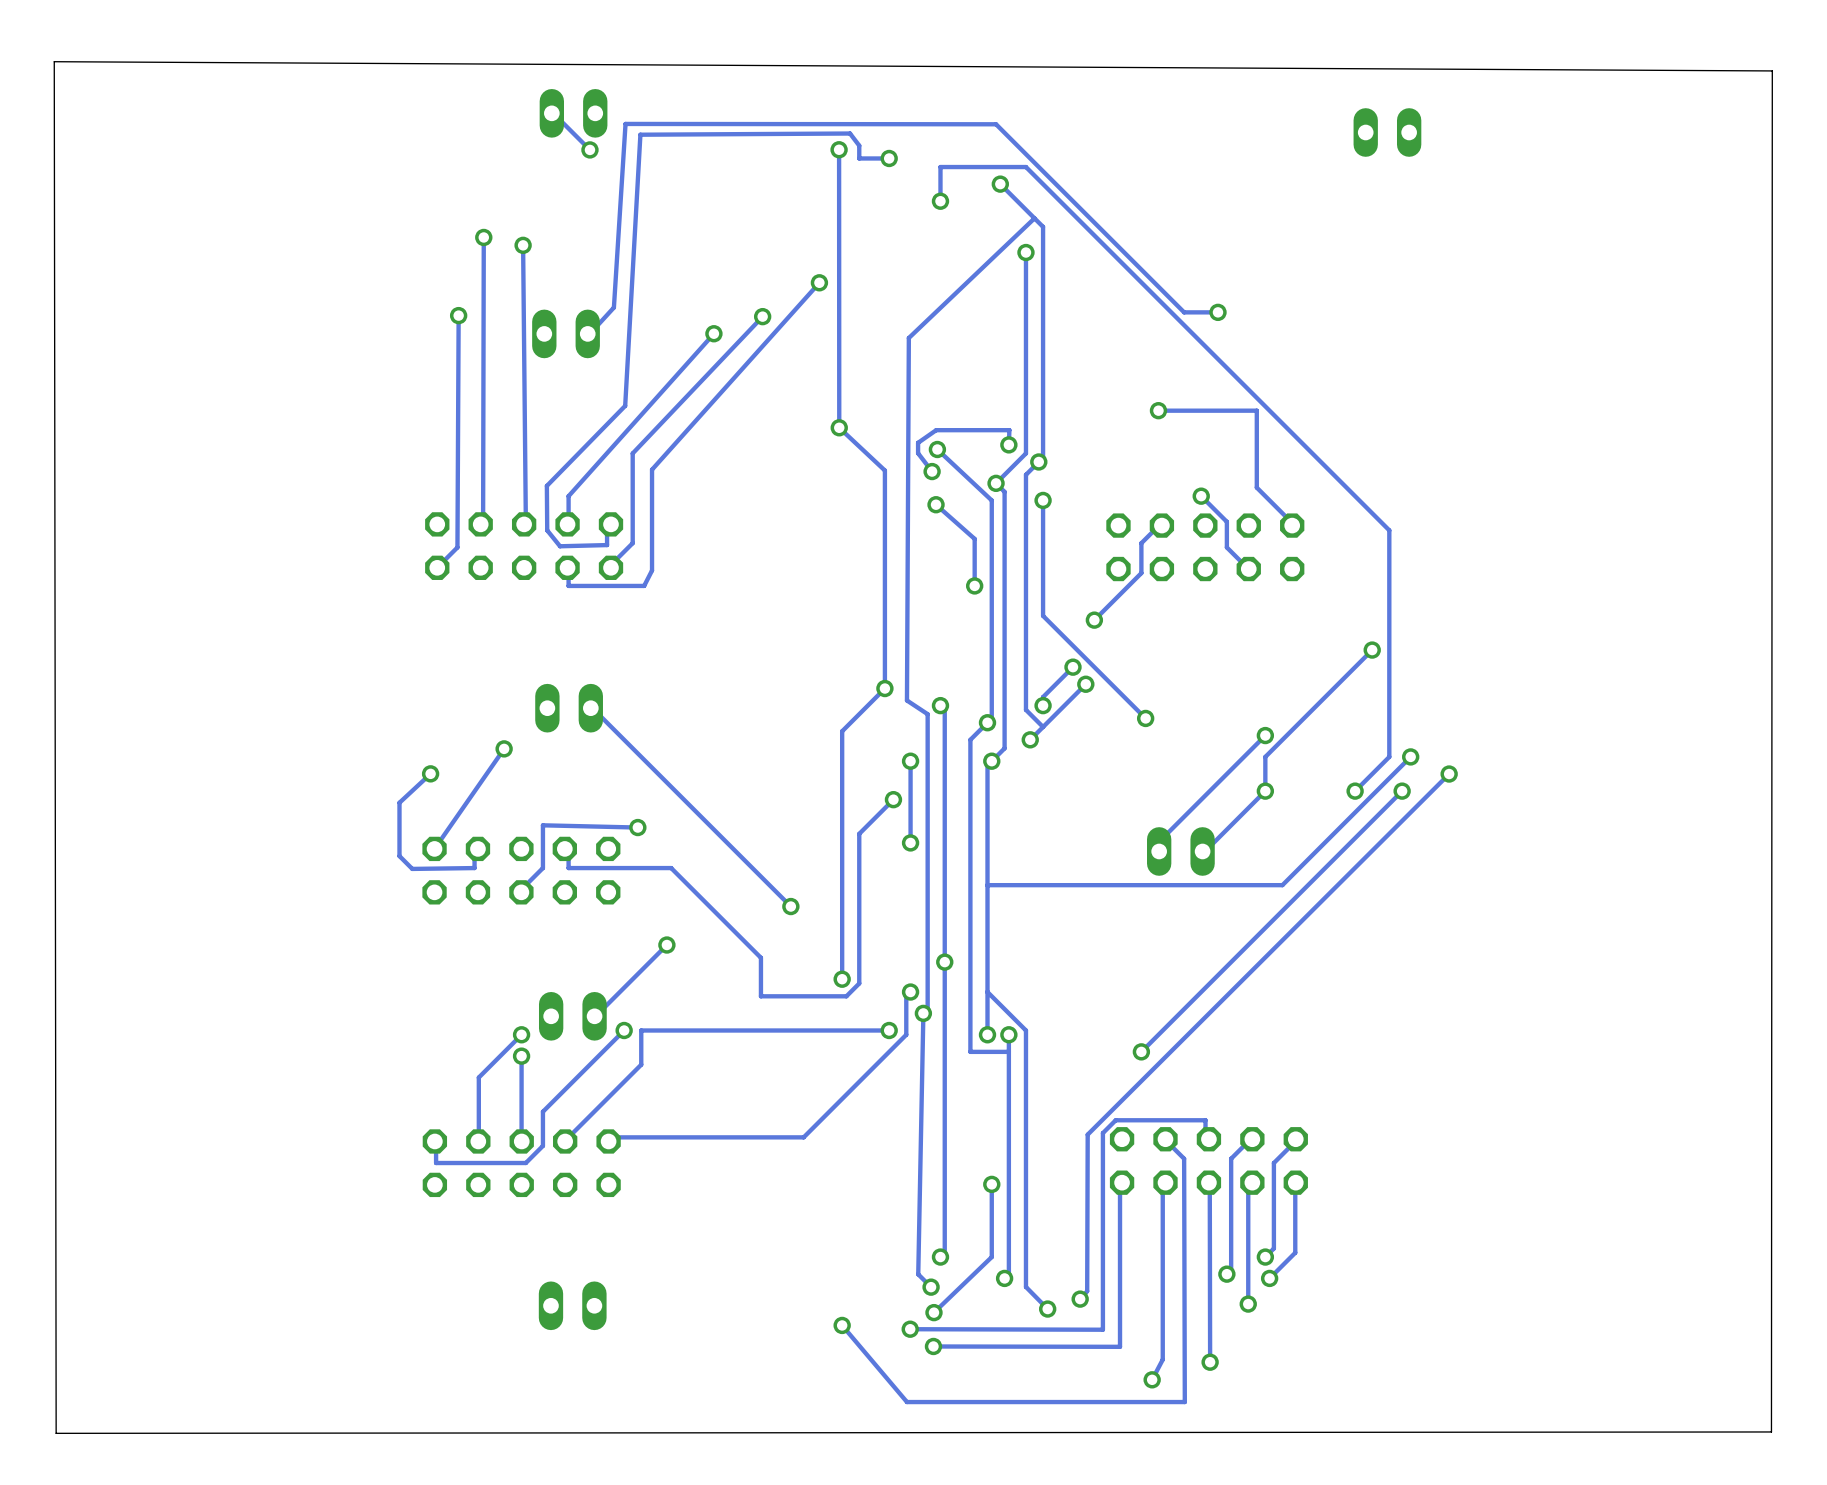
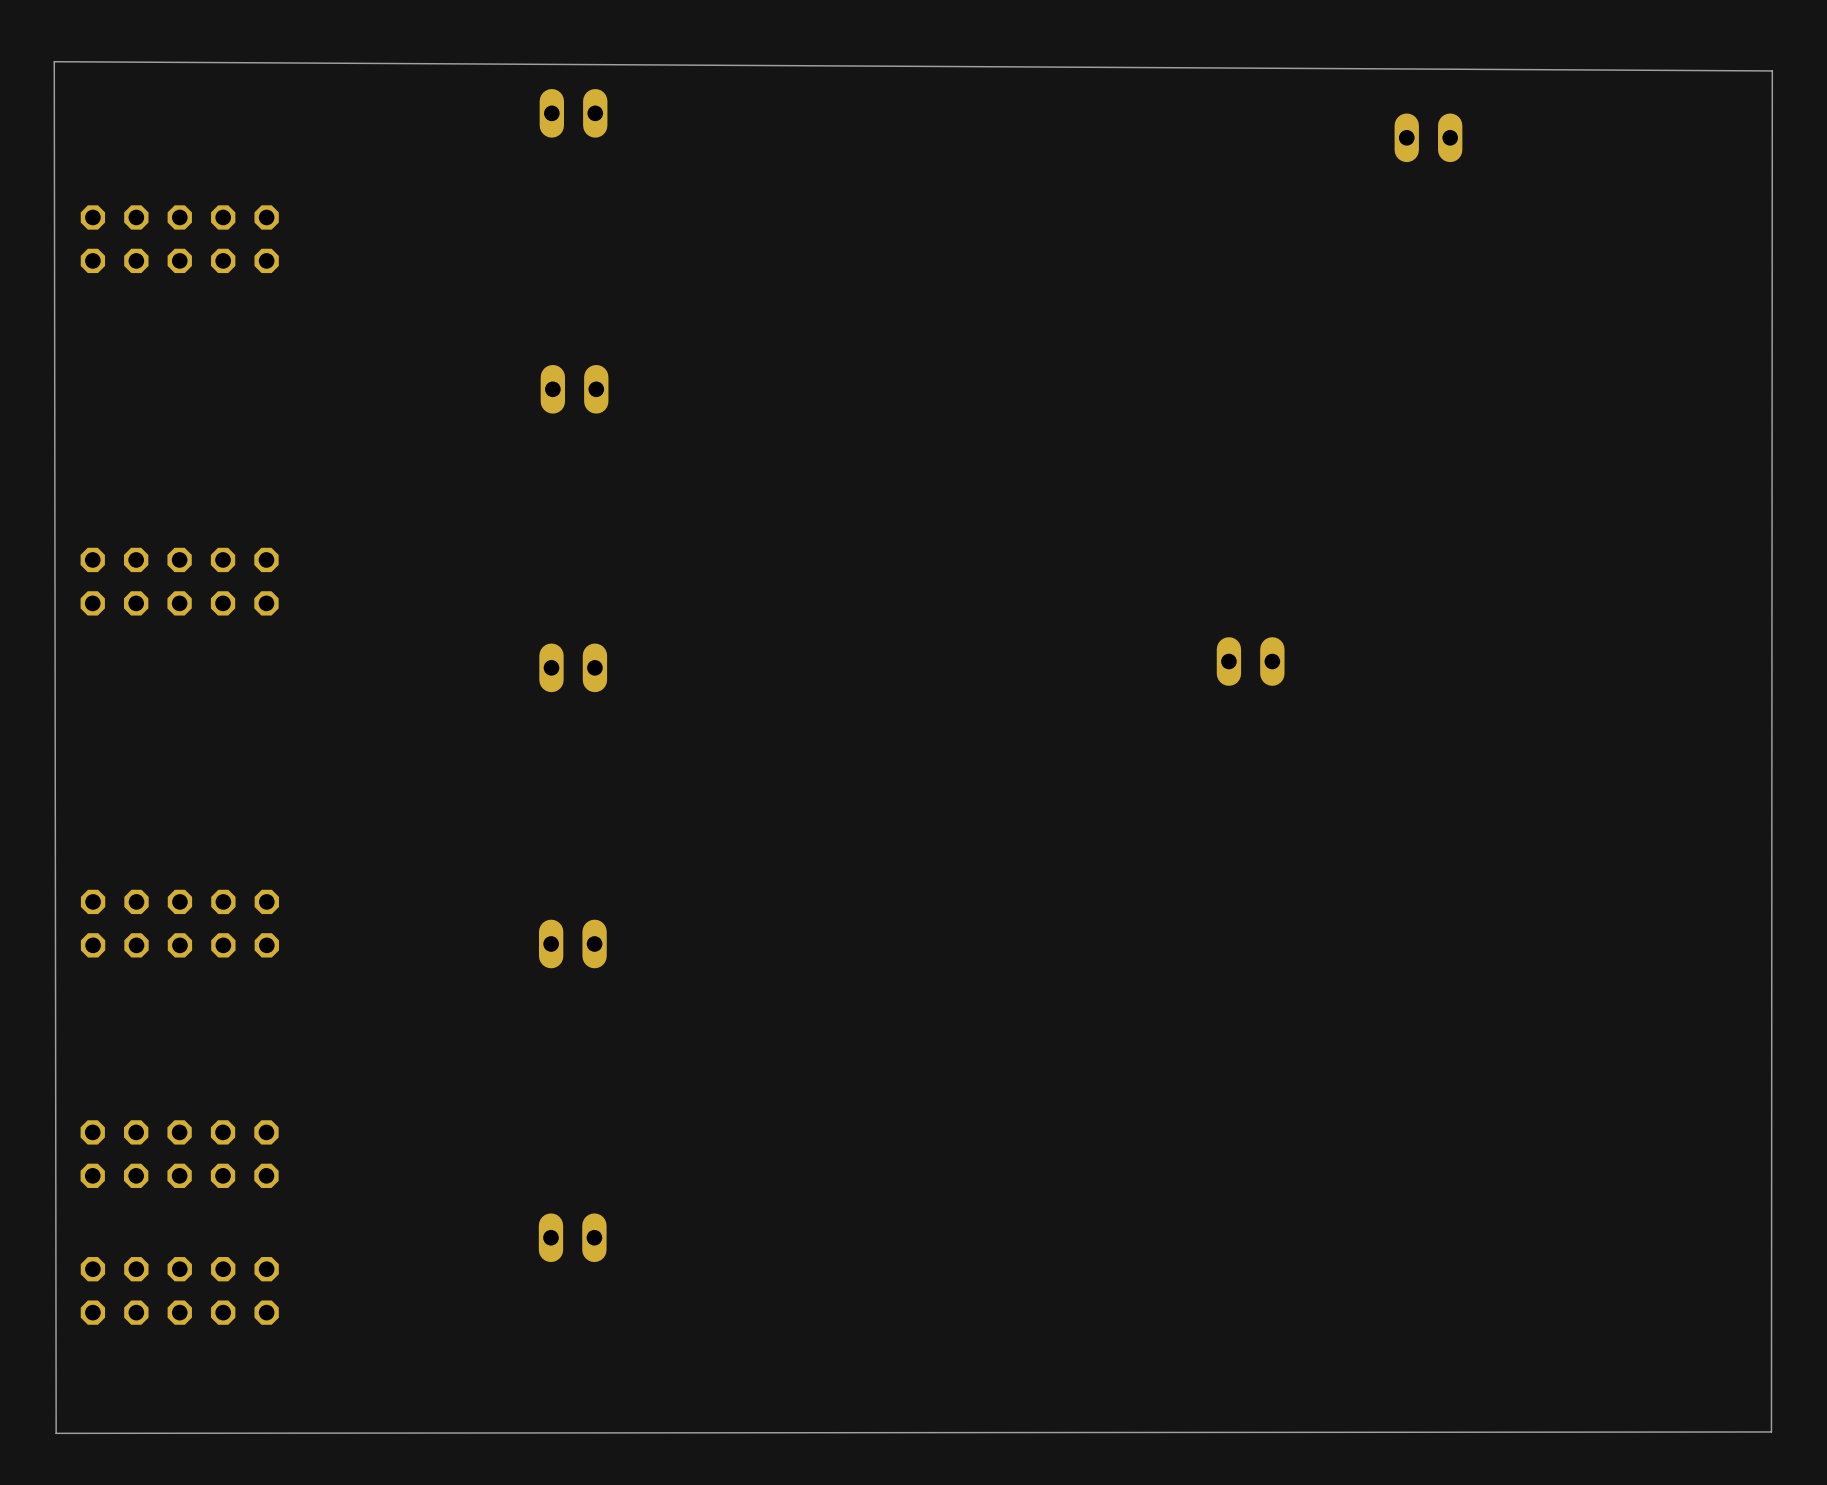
track: (551, 113) (589, 149) -> none
part position: (1387, 132) -> (1428, 137)
via: (589, 149) -> none
track: (839, 149) (839, 427) (884, 470) (884, 688) (842, 731) (842, 979) -> none
via: (839, 149) -> none
track: (889, 158) (859, 158) (859, 145) (850, 133) (640, 134) (625, 405) (546, 485) (547, 530) (560, 546) (607, 545) (607, 526) (610, 524) -> none
via: (889, 158) -> none
track: (1000, 184) (1043, 226) (1043, 457) (1025, 474) (1025, 709) (1043, 727) -> none
via: (1000, 184) -> none
track: (940, 201) (940, 167) (1025, 167) (1389, 530) (1389, 756) (1355, 791) -> none
via: (940, 201) -> none
track: (1034, 218) (908, 338) (906, 700) (927, 714) (927, 1009) (923, 1013) (918, 1274) (931, 1287) -> none
track: (483, 237) (483, 521) (480, 524) -> none
via: (483, 237) -> none
part: none -> (179, 239)
track: (523, 245) (525, 521) (524, 524) -> none
via: (523, 245) -> none
track: (1025, 252) (1025, 453) (996, 483) (1004, 491) (1004, 748) (987, 765) (987, 1034) -> none
via: (1025, 252) -> none
track: (819, 282) (652, 469) (652, 570) (644, 585) (568, 585) (567, 567) -> none
via: (819, 282) -> none
track: (1217, 312) (1184, 312) (996, 124) (625, 123) (613, 307) (587, 333) -> none
via: (1217, 312) -> none
track: (458, 315) (457, 547) (437, 567) -> none
via: (458, 315) -> none
track: (762, 316) (632, 453) (632, 543) (611, 564) (610, 567) -> none
via: (762, 316) -> none
part position: (566, 333) -> (574, 389)
track: (713, 333) (568, 496) (567, 524) -> none
via: (713, 333) -> none
track: (1158, 410) (1256, 410) (1256, 487) (1291, 521) (1292, 525) -> none
via: (1158, 410) -> none
via: (839, 427) -> none
track: (1008, 444) (1009, 430) (936, 430) (918, 442) (918, 453) (932, 471) -> none
via: (1008, 444) -> none
track: (937, 449) (991, 500) (991, 718) (970, 739) (970, 1051) (1008, 1051) -> none
via: (937, 449) -> none
via: (1038, 461) -> none
via: (932, 471) -> none
via: (996, 483) -> none
track: (1201, 496) (1226, 521) (1226, 547) (1248, 569) -> none
via: (1201, 496) -> none
track: (1043, 500) (1043, 615) (1145, 718) -> none
via: (1043, 500) -> none
track: (936, 504) (974, 538) (974, 585) -> none
via: (936, 504) -> none
track: (1161, 525) (1158, 526) (1141, 543) (1141, 573) (1094, 620) -> none
part: (524, 546) -> none
part: (1205, 547) -> none
part: none -> (179, 581)
via: (974, 585) -> none
via: (1094, 620) -> none
track: (1372, 650) (1265, 756) (1265, 791) (1205, 850) (1202, 851) -> none
via: (1372, 650) -> none
track: (1072, 667) (1043, 697) (1043, 705) -> none
via: (1072, 667) -> none
track: (1085, 684) (1030, 739) -> none
via: (1085, 684) -> none
via: (884, 688) -> none
track: (940, 705) (944, 709) (944, 1252) (940, 1257) -> none
via: (940, 705) -> none
via: (1043, 705) -> none
part position: (569, 708) -> (573, 667)
track: (590, 708) (790, 906) -> none
via: (1145, 718) -> none
via: (987, 722) -> none
track: (1265, 735) (1162, 838) (1162, 850) (1159, 851) -> none
via: (1265, 735) -> none
via: (1030, 739) -> none
track: (504, 748) (434, 848) -> none
via: (504, 748) -> none
track: (1410, 756) (1282, 885) (987, 885) -> none
via: (1410, 756) -> none
track: (910, 761) (910, 842) -> none
via: (910, 761) -> none
via: (991, 761) -> none
track: (430, 773) (399, 802) (399, 856) (412, 868) (474, 868) (474, 850) (477, 848) -> none
via: (430, 773) -> none
track: (1449, 774) (1087, 1134) (1087, 1291) (1080, 1299) -> none
via: (1449, 774) -> none
via: (1265, 791) -> none
via: (1355, 791) -> none
track: (1402, 791) (1141, 1051) -> none
via: (1402, 791) -> none
track: (893, 799) (859, 833) (859, 983) (846, 996) (760, 996) (760, 957) (671, 868) (568, 868) (568, 850) (564, 848) -> none
via: (893, 799) -> none
track: (637, 827) (542, 825) (542, 868) (521, 889) (521, 892) -> none
via: (637, 827) -> none
via: (910, 842) -> none
part position: (1180, 851) -> (1250, 661)
part: (521, 870) -> none
via: (790, 906) -> none
part: none -> (179, 923)
track: (666, 945) (594, 1016) -> none
via: (666, 945) -> none
via: (944, 962) -> none
via: (842, 979) -> none
track: (910, 992) (906, 996) (906, 1034) (803, 1137) (611, 1137) (608, 1141) -> none
via: (910, 992) -> none
track: (987, 992) (1025, 1030) (1025, 1286) (1047, 1309) -> none
via: (923, 1013) -> none
part position: (572, 1016) -> (572, 943)
track: (624, 1030) (542, 1111) (542, 1145) (525, 1163) (436, 1163) (434, 1141) -> none
via: (624, 1030) -> none
track: (889, 1030) (641, 1030) (641, 1064) (565, 1141) -> none
via: (889, 1030) -> none
track: (521, 1034) (478, 1077) (478, 1141) -> none
via: (521, 1034) -> none
via: (987, 1034) -> none
track: (1008, 1034) (1008, 1274) (1004, 1278) -> none
via: (1008, 1034) -> none
via: (1141, 1051) -> none
track: (521, 1056) (521, 1141) -> none
via: (521, 1056) -> none
track: (1165, 1139) (1184, 1158) (1184, 1402) (906, 1402) (842, 1325) -> none
track: (1208, 1139) (1205, 1137) (1205, 1120) (1115, 1120) (1102, 1133) (1102, 1329) (910, 1329) -> none
track: (1252, 1139) (1231, 1158) (1231, 1269) (1226, 1274) -> none
track: (1295, 1139) (1273, 1163) (1273, 1248) (1265, 1257) -> none
part: none -> (179, 1154)
part: (1208, 1160) -> none
part: (521, 1163) -> none
track: (1122, 1182) (1120, 1184) (1120, 1346) (933, 1346) -> none
track: (1165, 1182) (1162, 1184) (1162, 1359) (1152, 1379) -> none
track: (1208, 1182) (1210, 1362) -> none
track: (1252, 1182) (1248, 1184) (1248, 1304) -> none
track: (1295, 1182) (1295, 1252) (1269, 1278) -> none
track: (991, 1184) (991, 1257) (933, 1312) -> none
via: (991, 1184) -> none
via: (940, 1257) -> none
via: (1265, 1257) -> none
via: (1226, 1274) -> none
via: (1004, 1278) -> none
via: (1269, 1278) -> none
via: (931, 1287) -> none
part: none -> (179, 1290)
via: (1080, 1299) -> none
via: (1248, 1304) -> none
part position: (572, 1305) -> (572, 1237)
via: (1047, 1309) -> none
via: (933, 1312) -> none
via: (842, 1325) -> none
via: (910, 1329) -> none
via: (933, 1346) -> none
via: (1210, 1362) -> none
via: (1152, 1379) -> none

